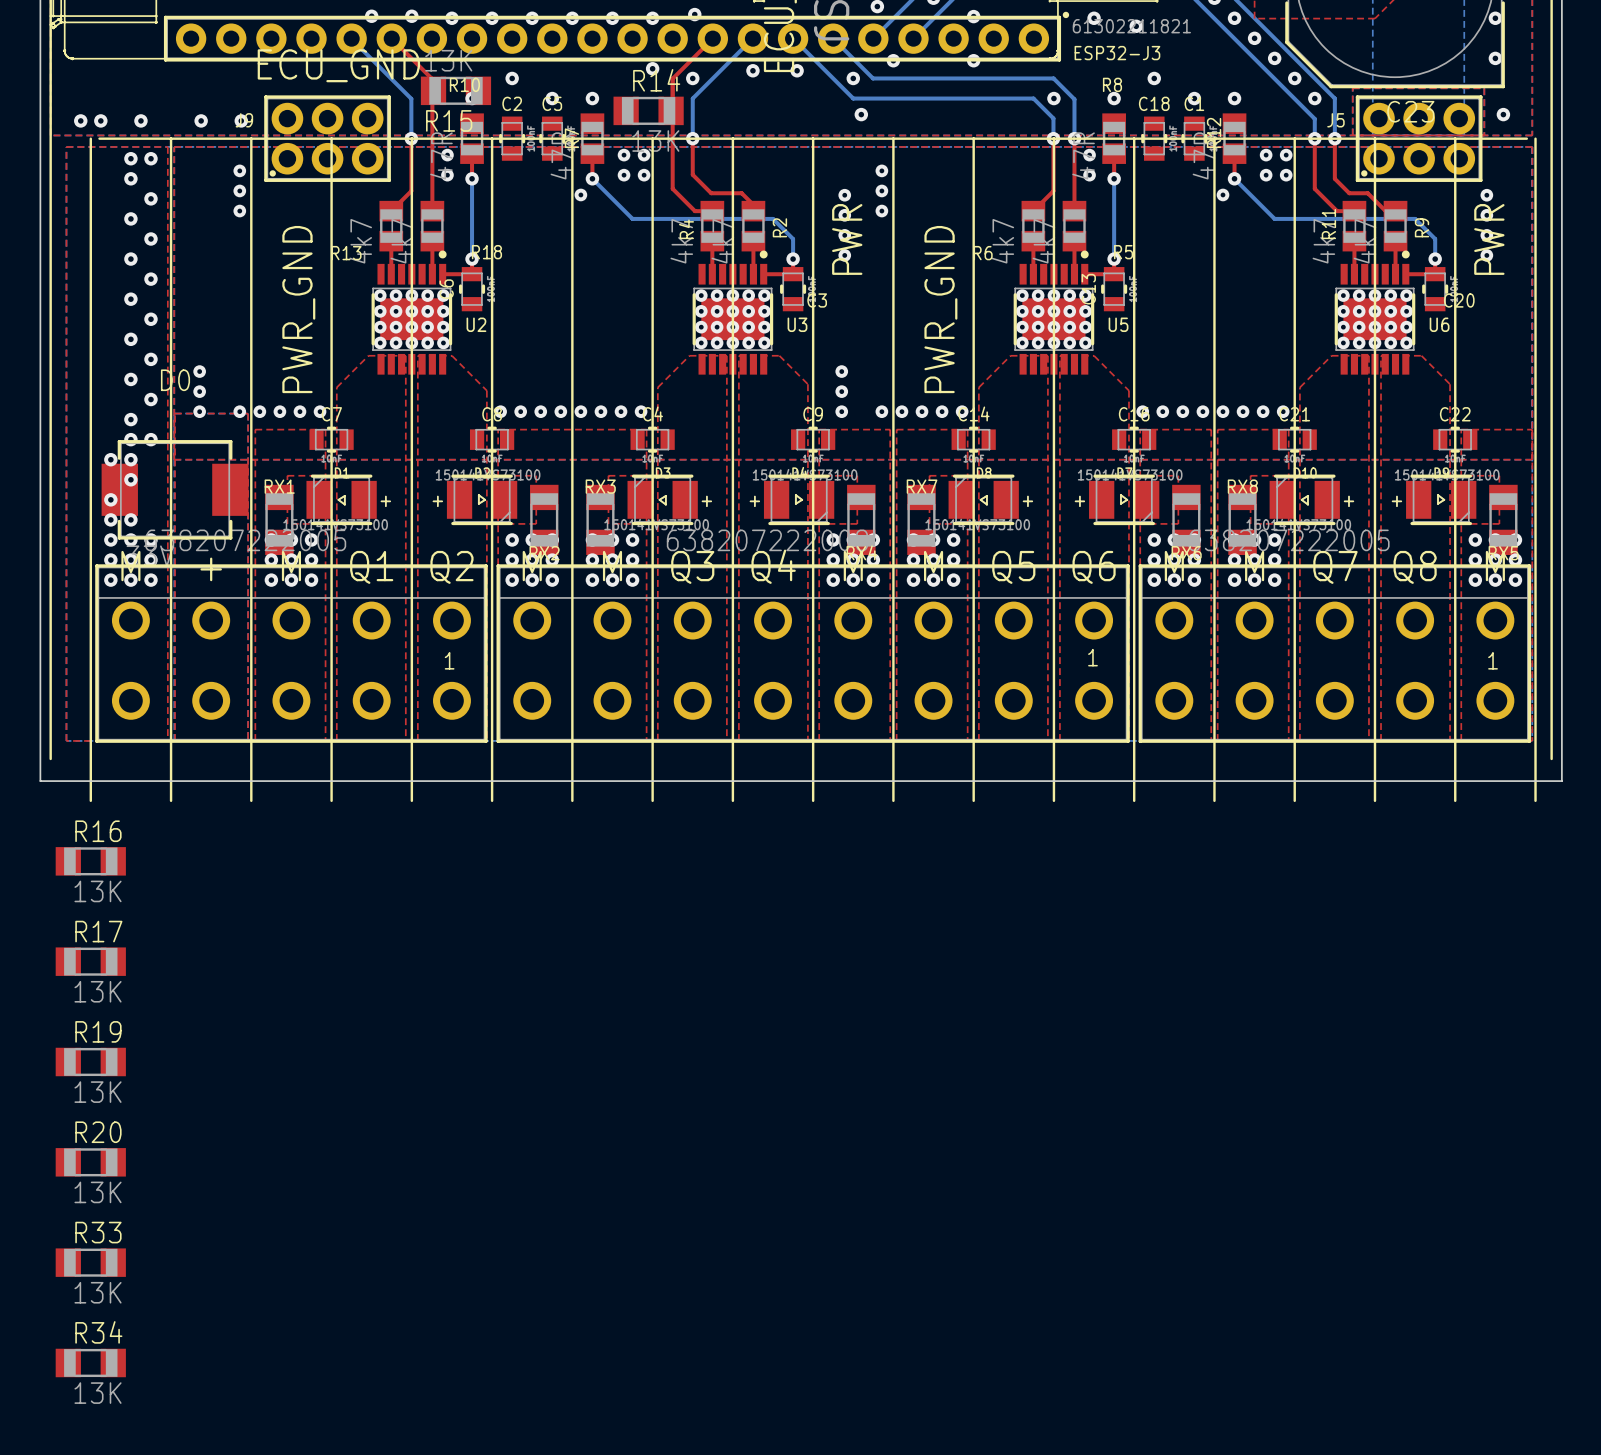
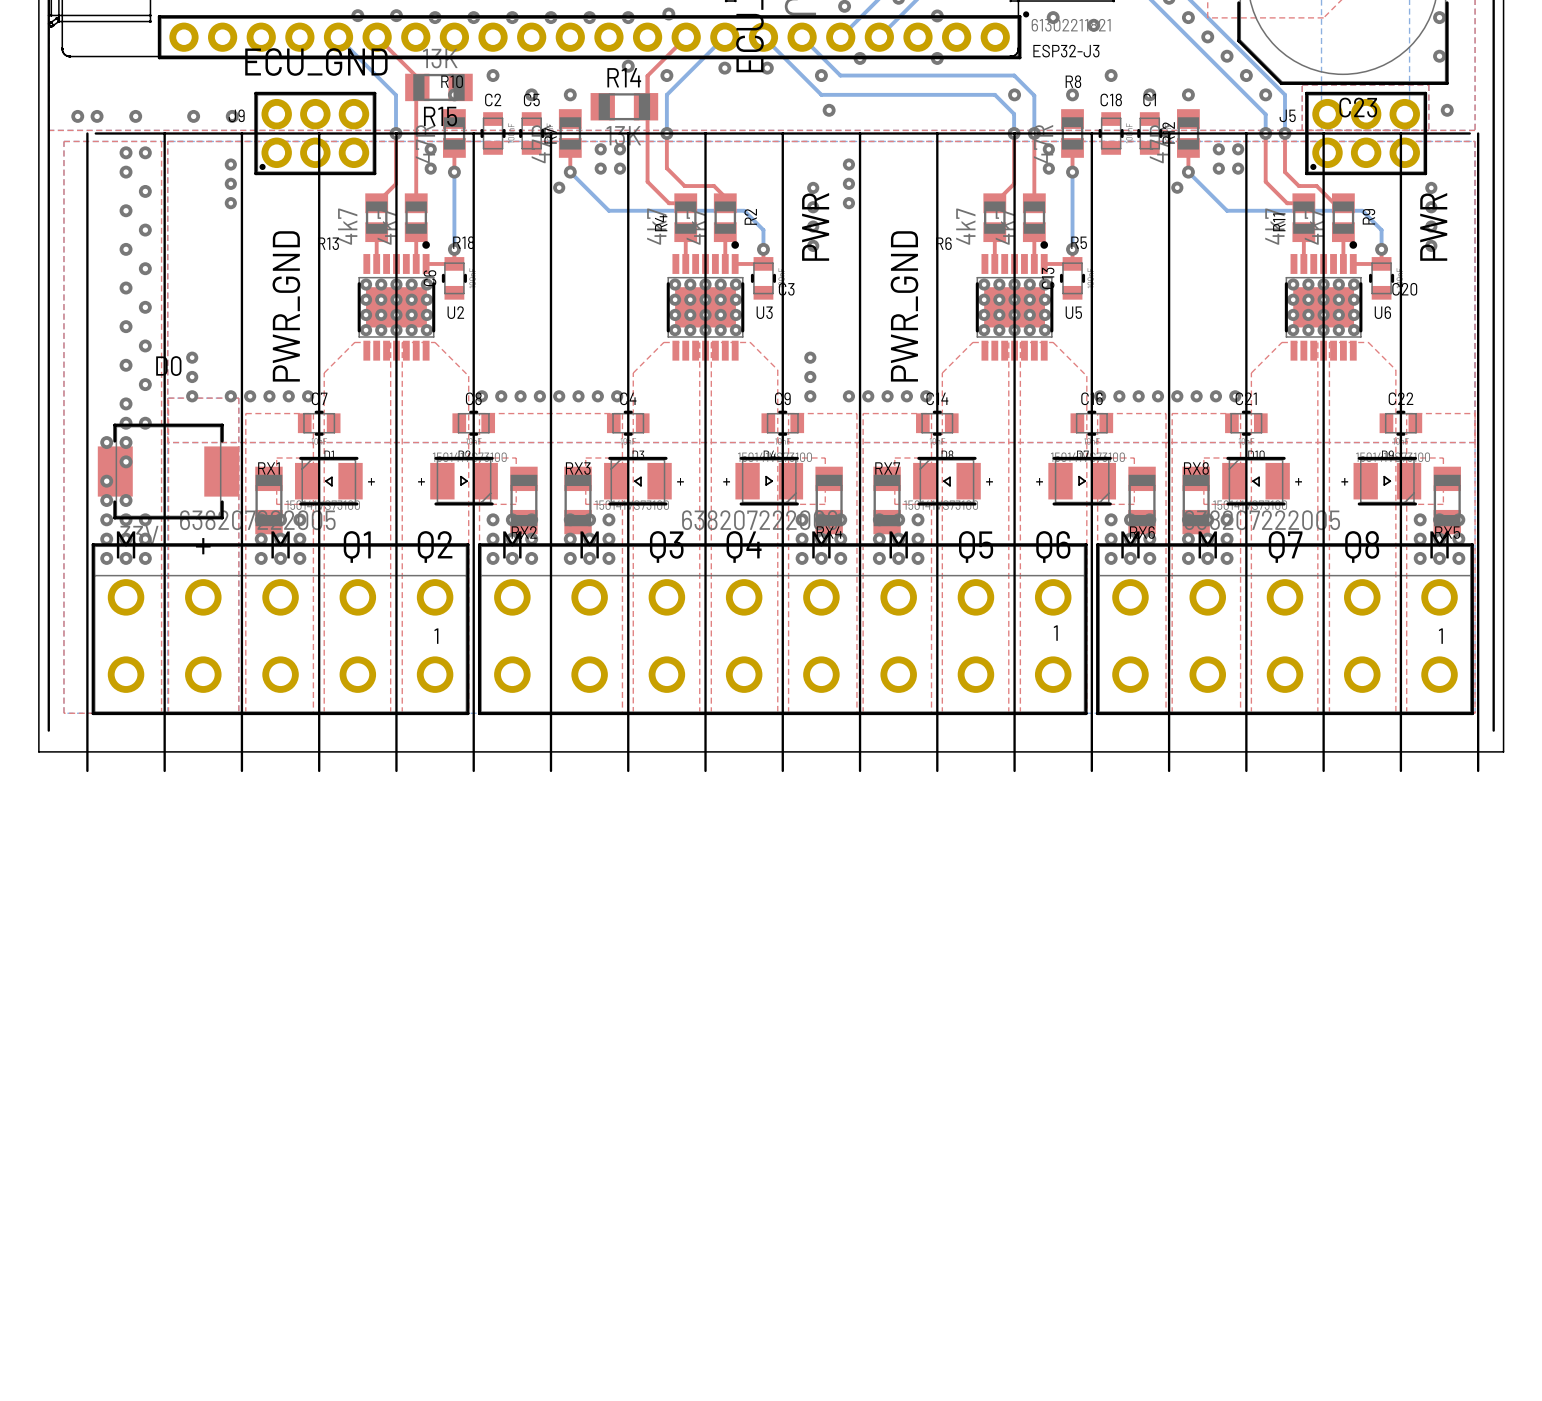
R16: 13K (90, 861) -> none
R17: 13K (90, 961) -> none
R19: 13K (90, 1062) -> none
R20: 13K (90, 1162) -> none
R33: 13K (90, 1262) -> none
R34: 13K (90, 1362) -> none

